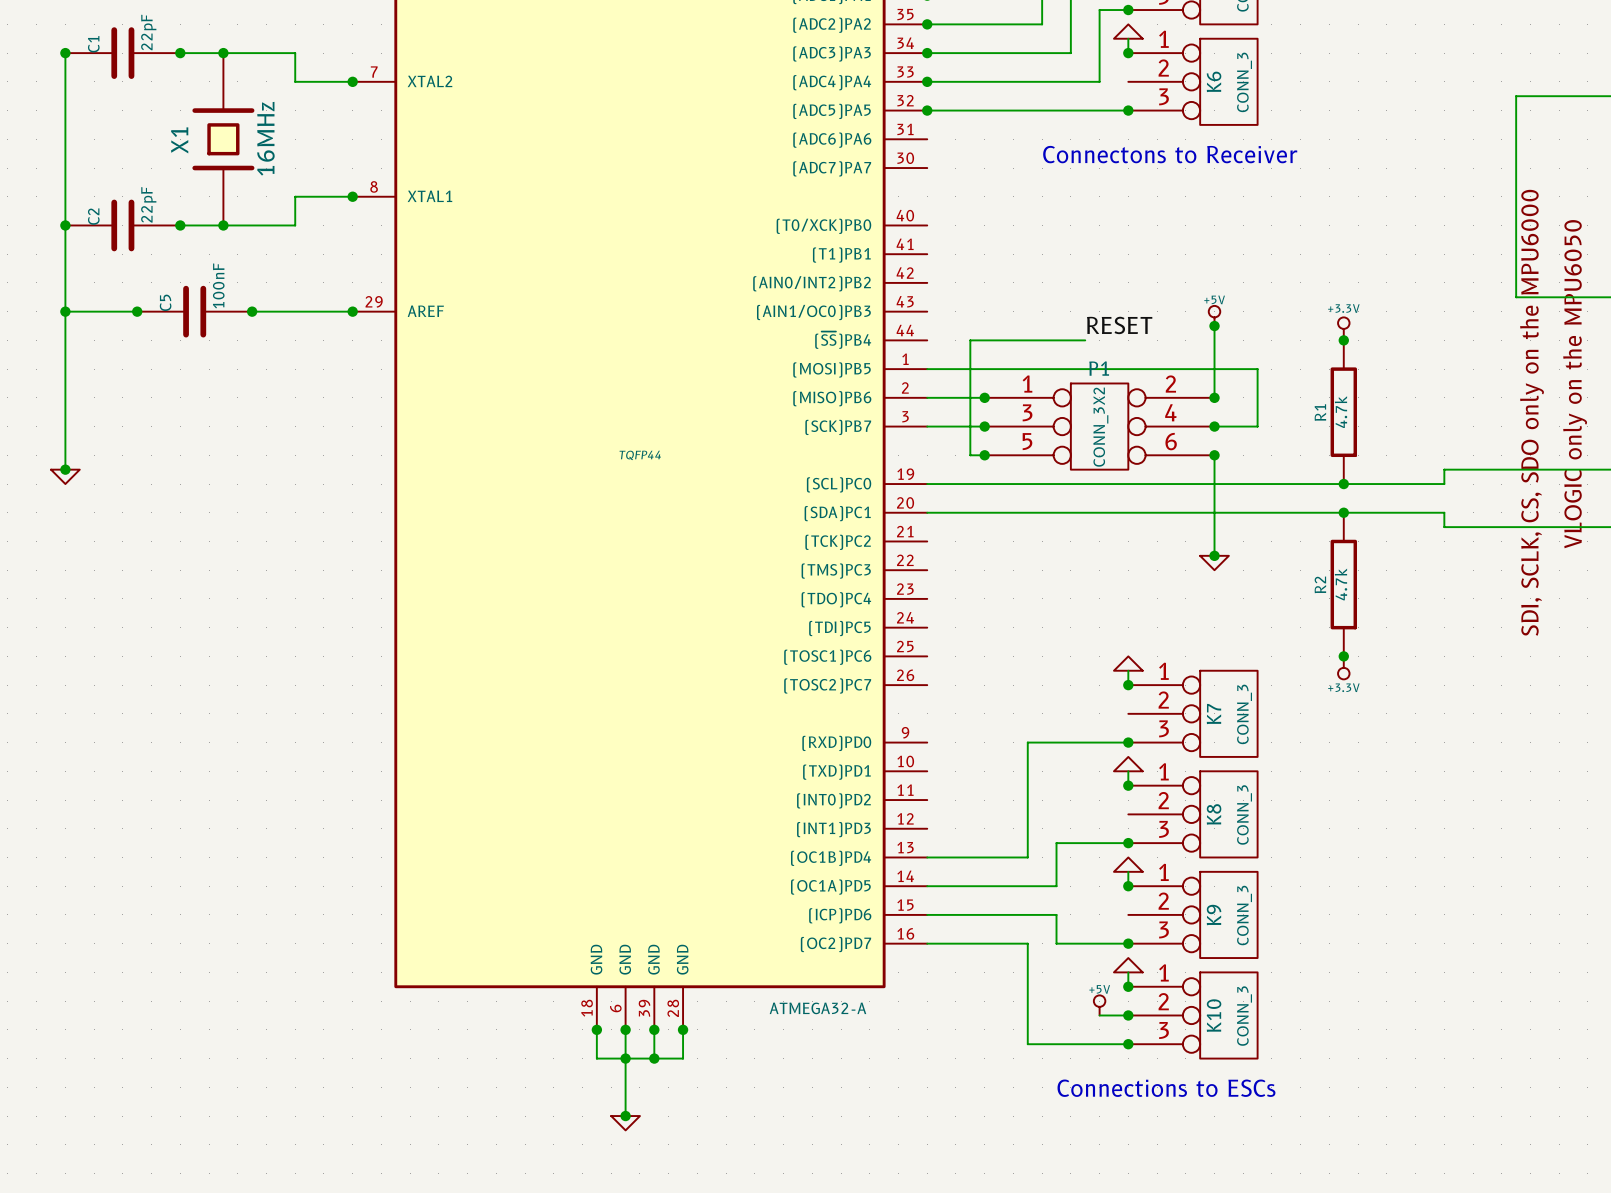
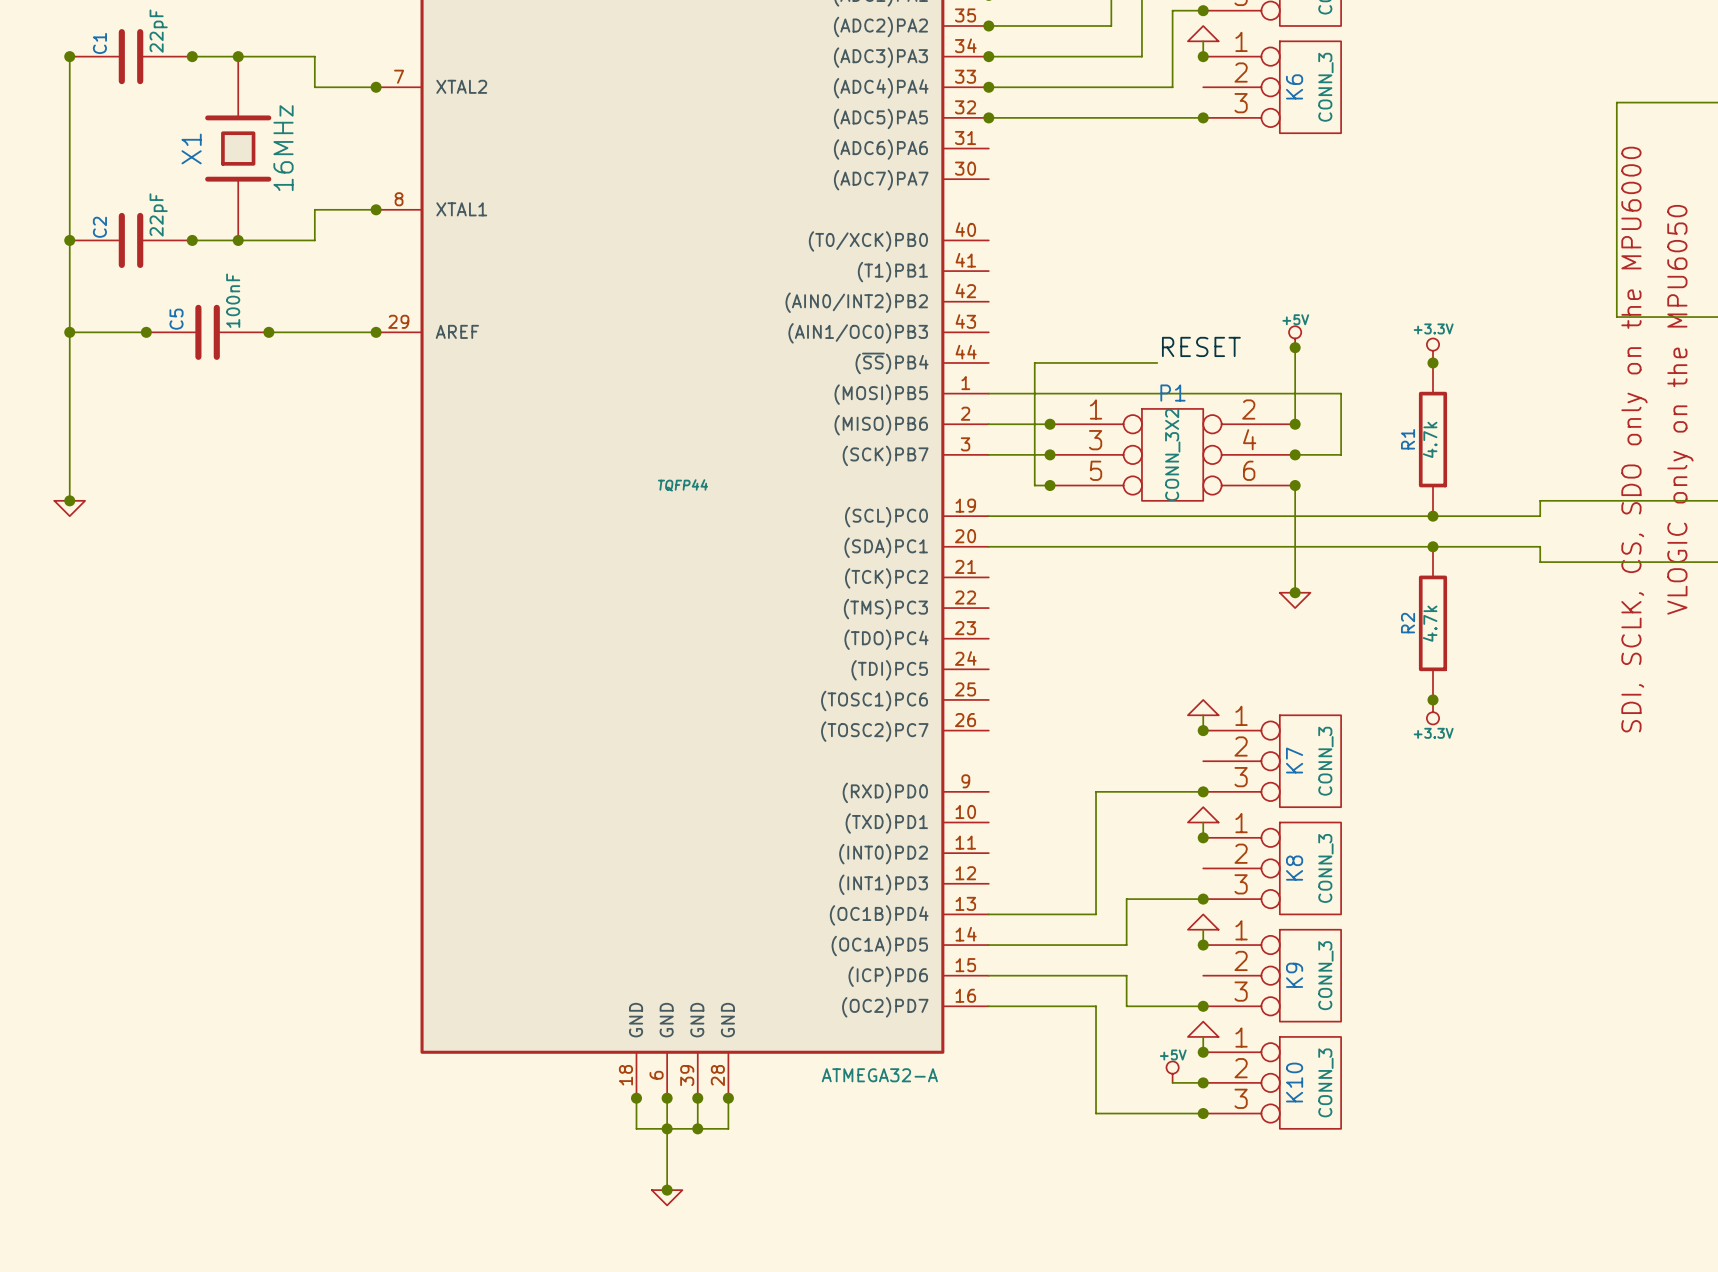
text: Connectons to Receiver (1170, 154) -> none
text: Connections to ESCs (1166, 1088) -> none

